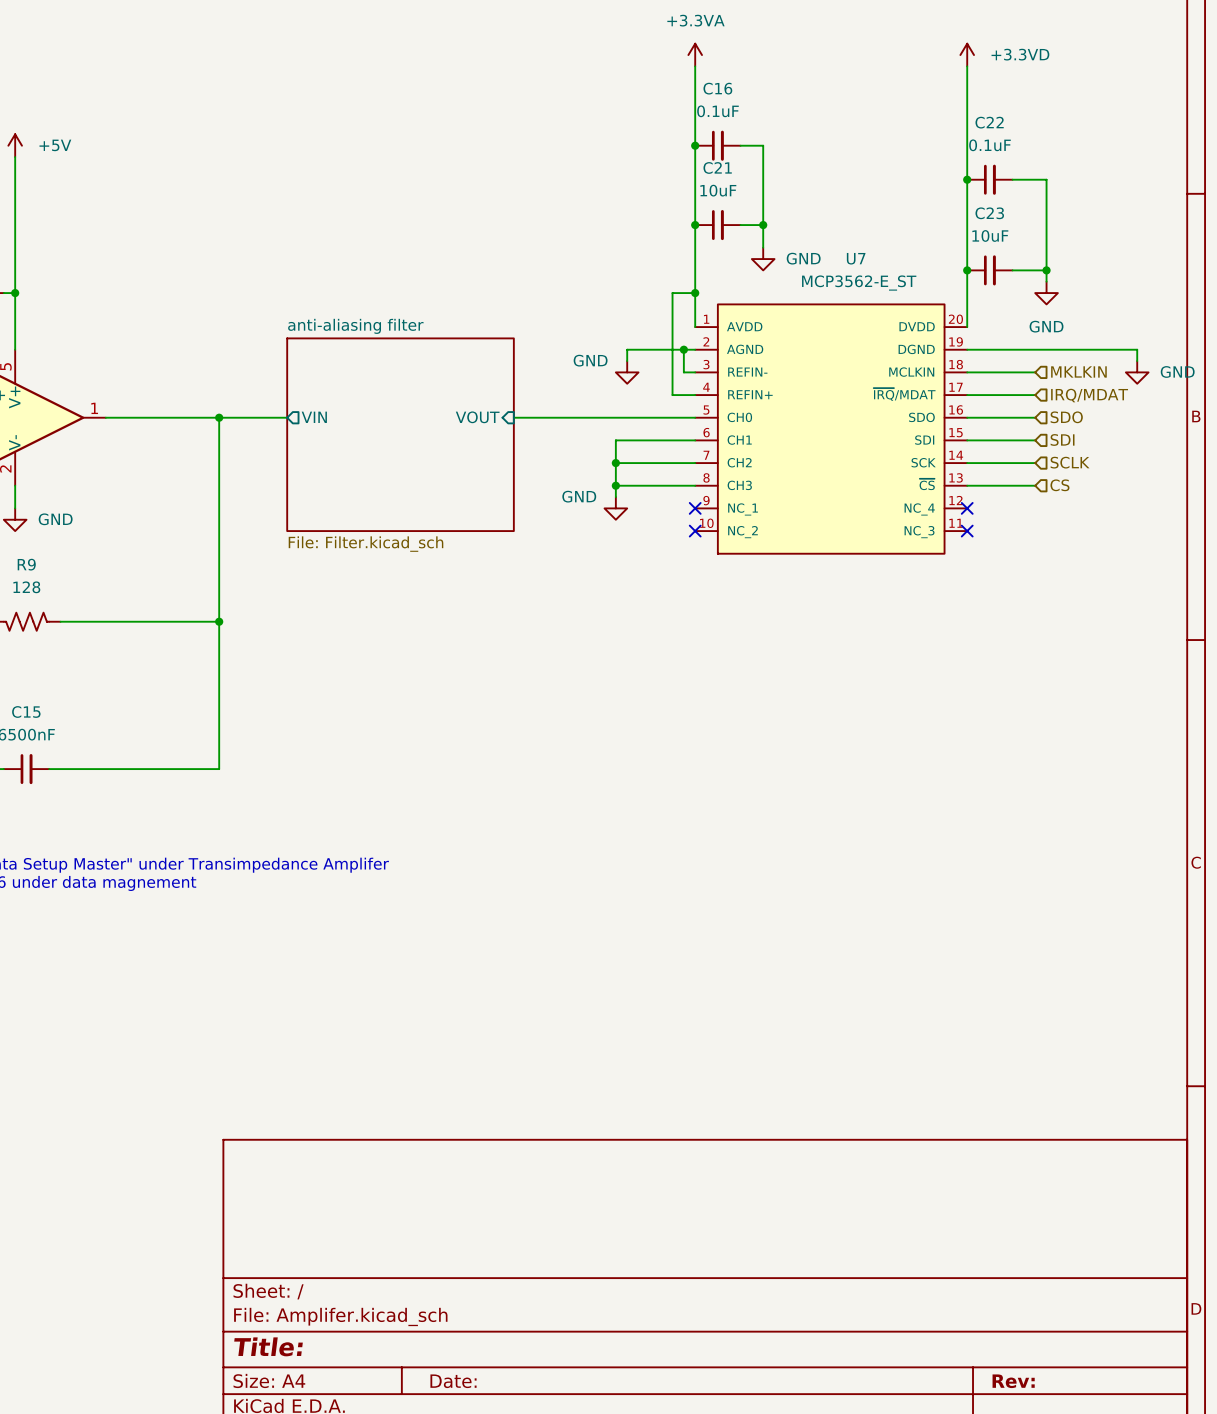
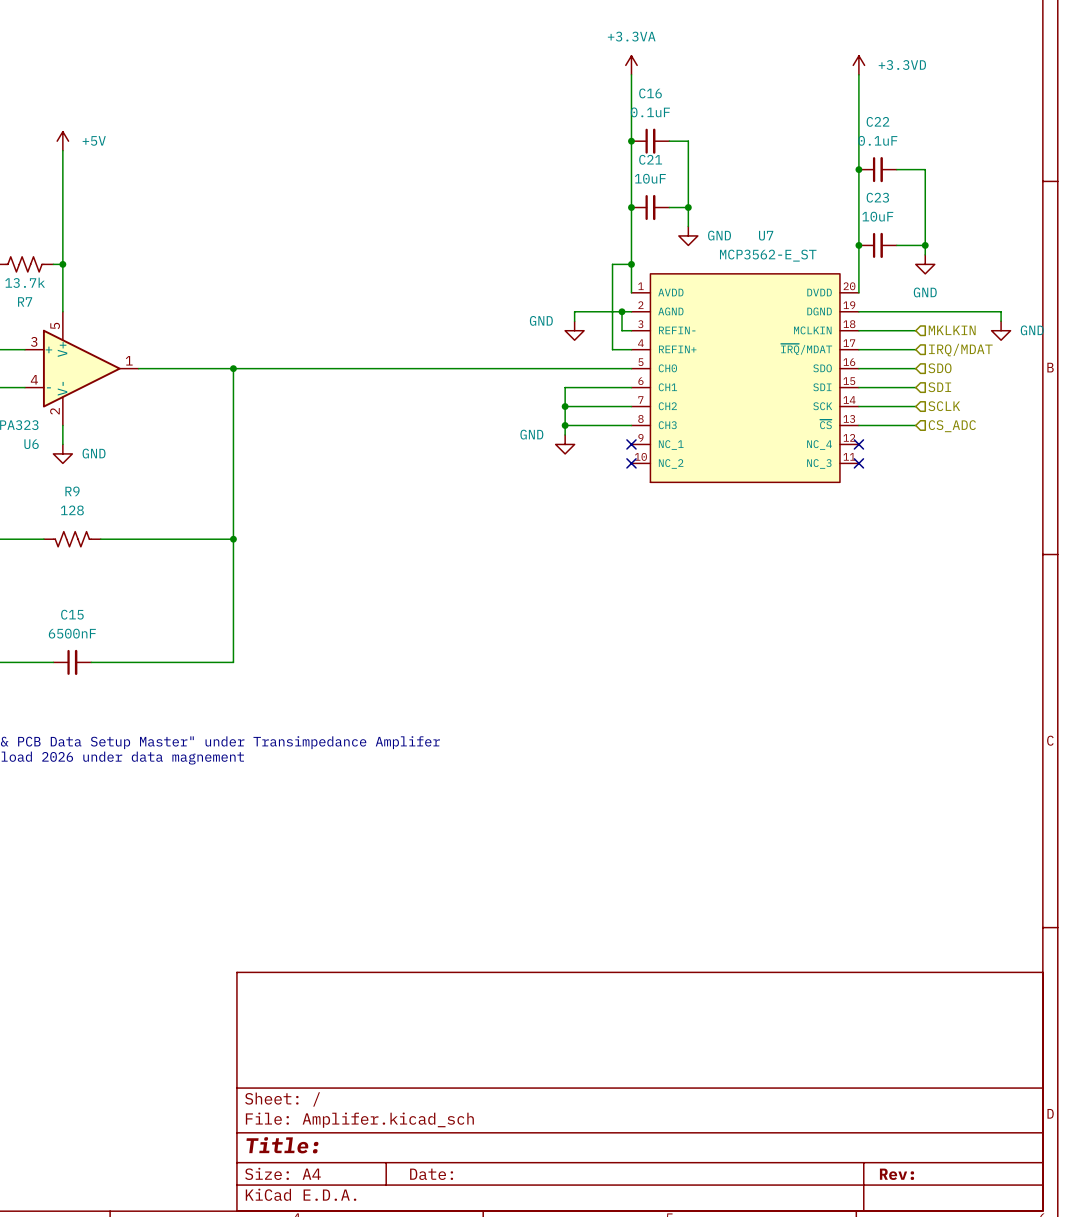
wire: none -> (290, 368) (479, 368)
sheet pin: VIN (314, 417) -> none
sheet pin: VOUT (477, 417) -> none
sheet anti-aliasing filter: File: Filter.kicad_sch (400, 434) -> none
hierarchical label: CS (1059, 485) -> CS_ADC (952, 426)

